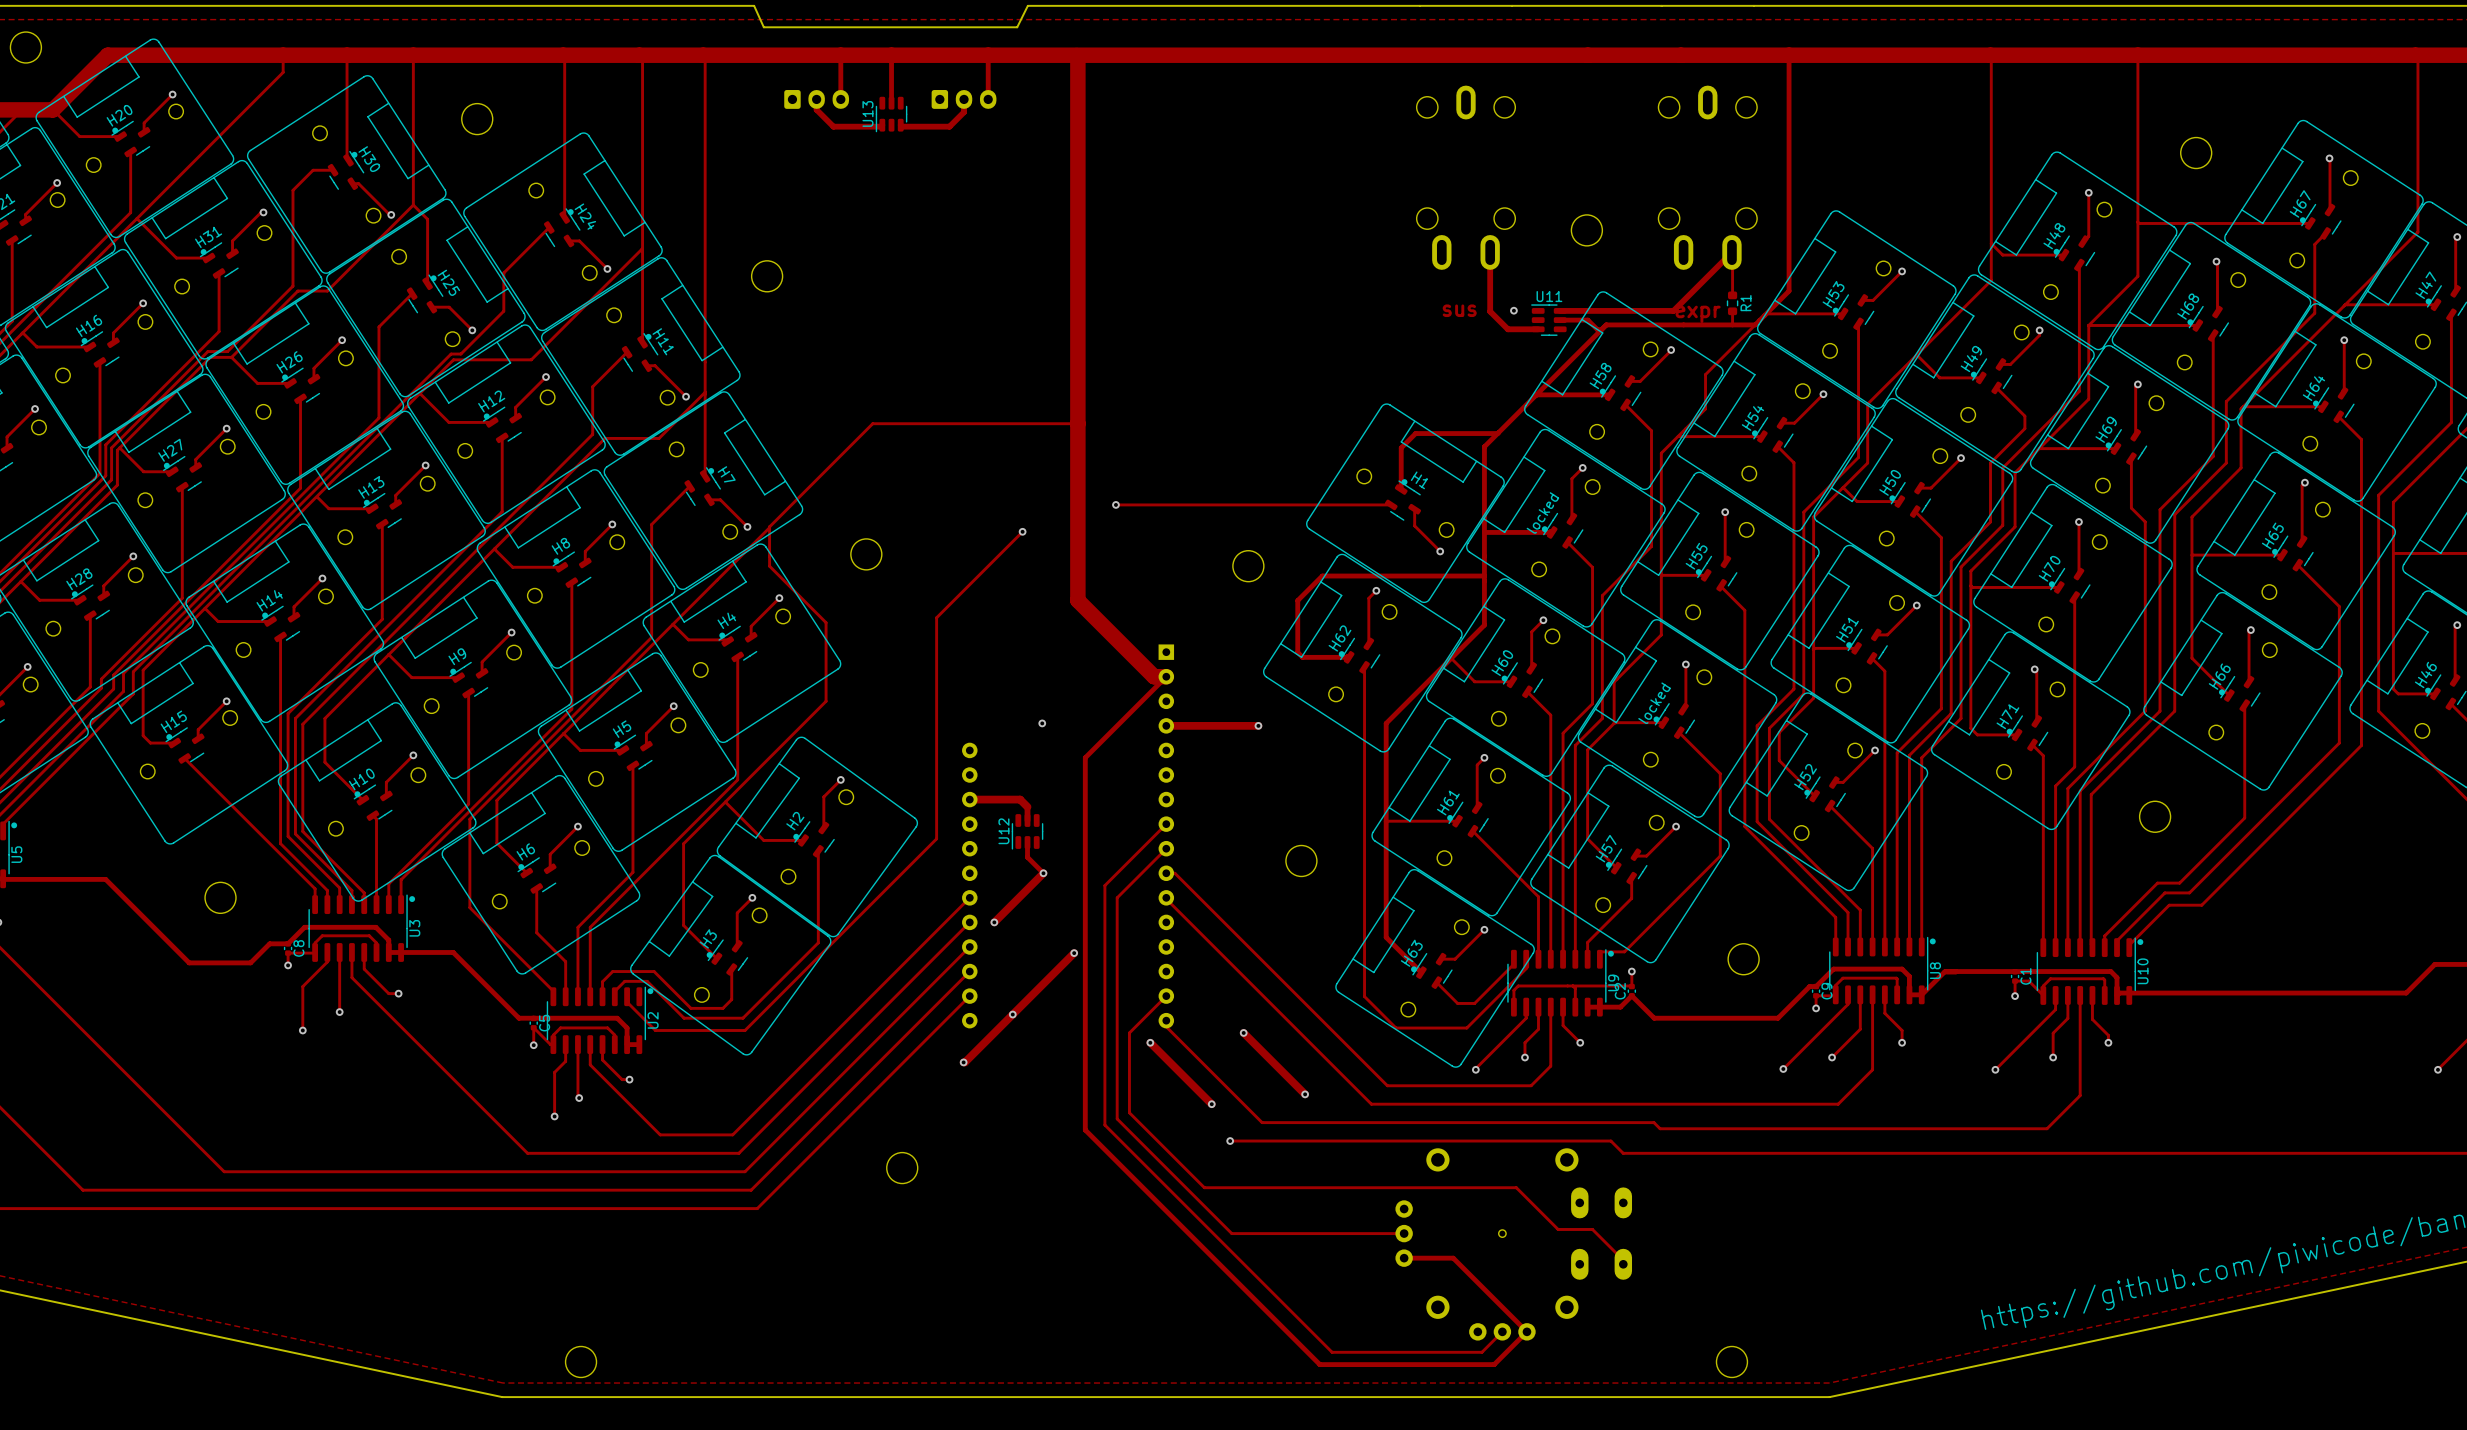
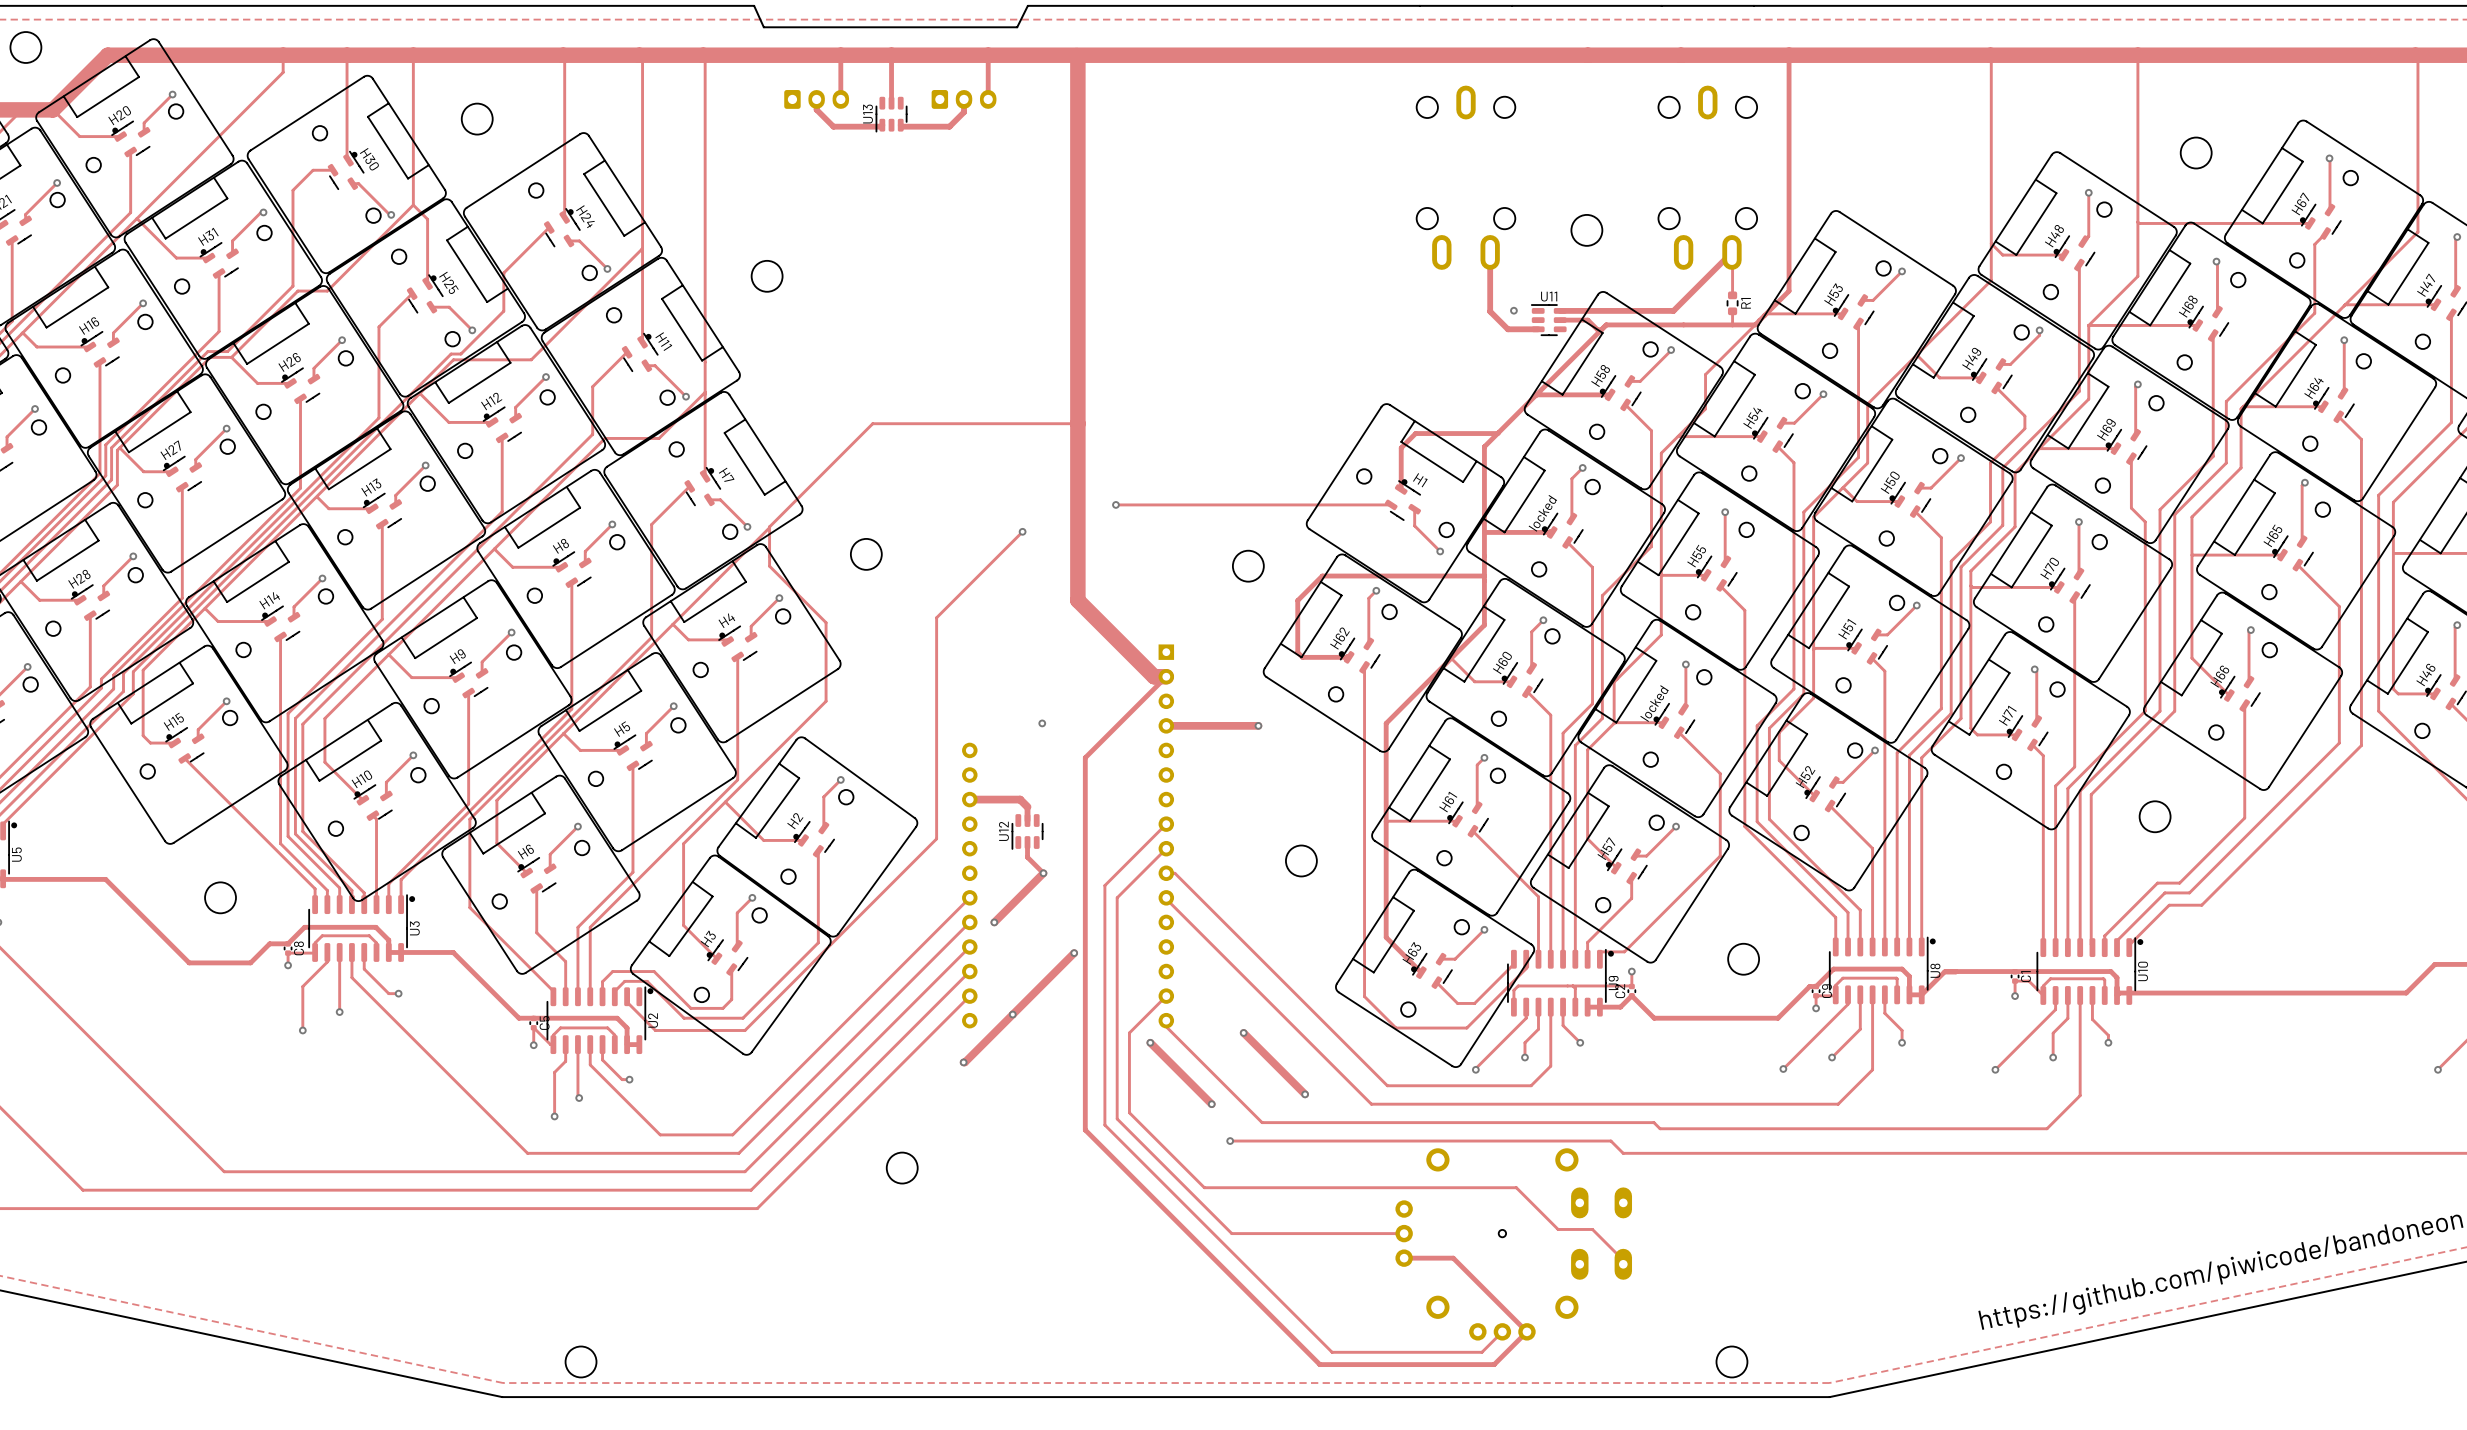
text: sus (1459, 310) -> none
text: expr (1698, 314) -> none

